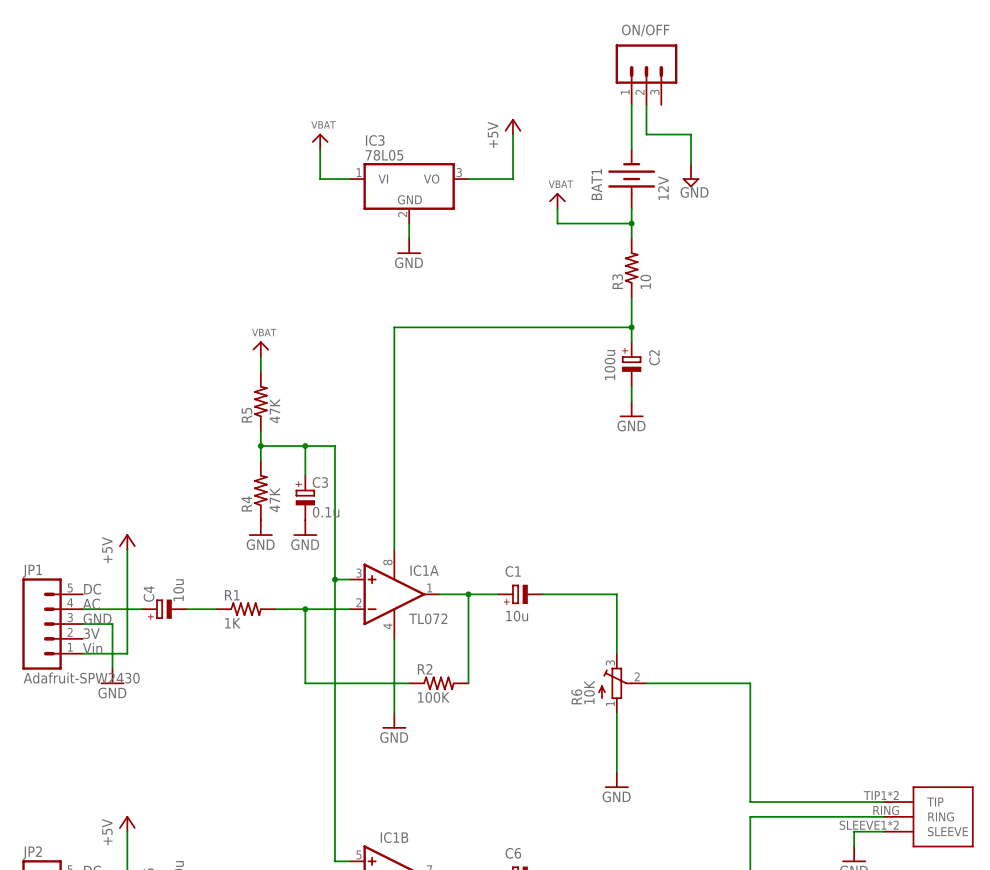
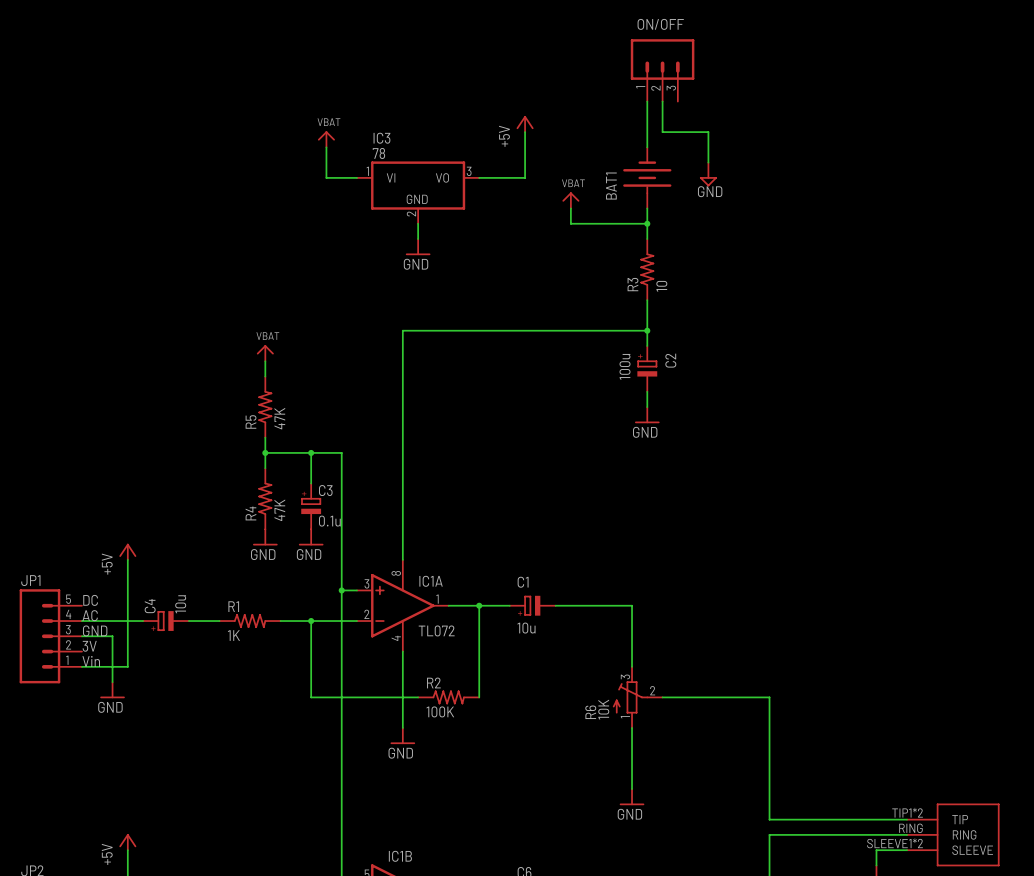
IC3 value: 78L05 (384, 155) -> 78 (378, 153)
BAT1 value: 12V (663, 188) -> none
JP1 value: Adafruit-SPW2430 (81, 678) -> none

